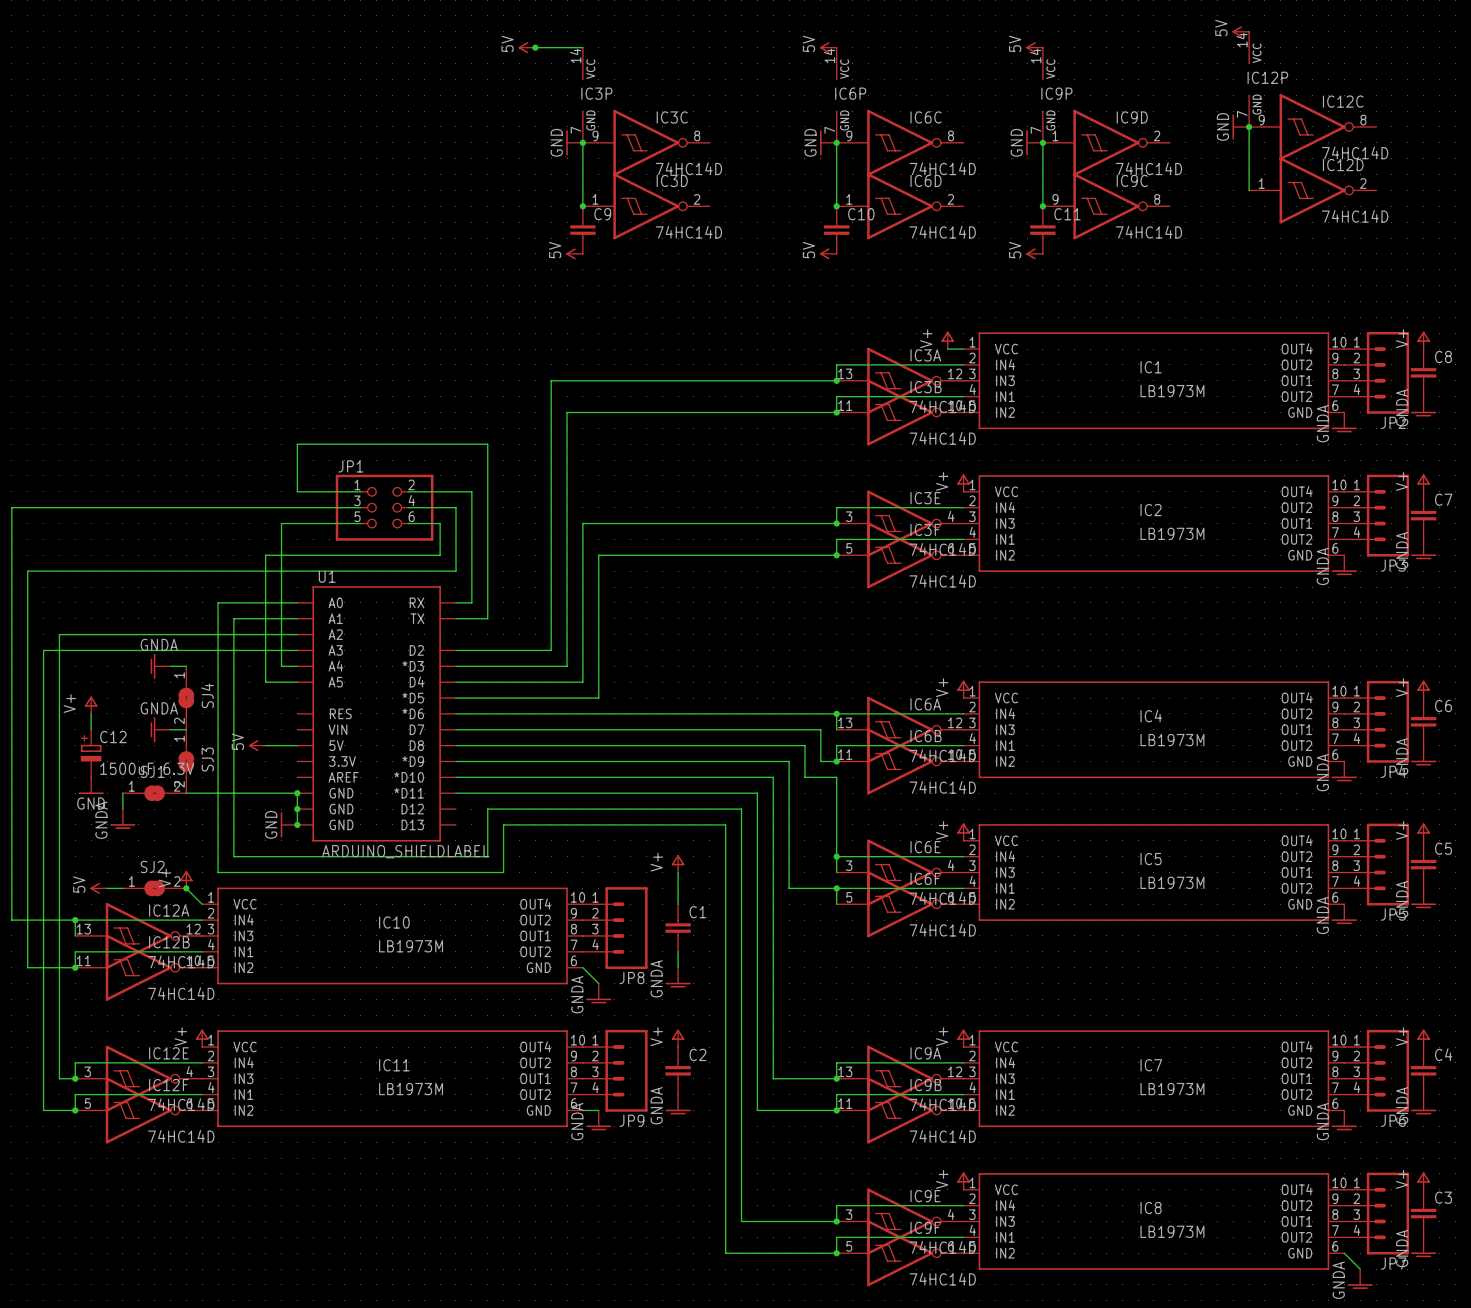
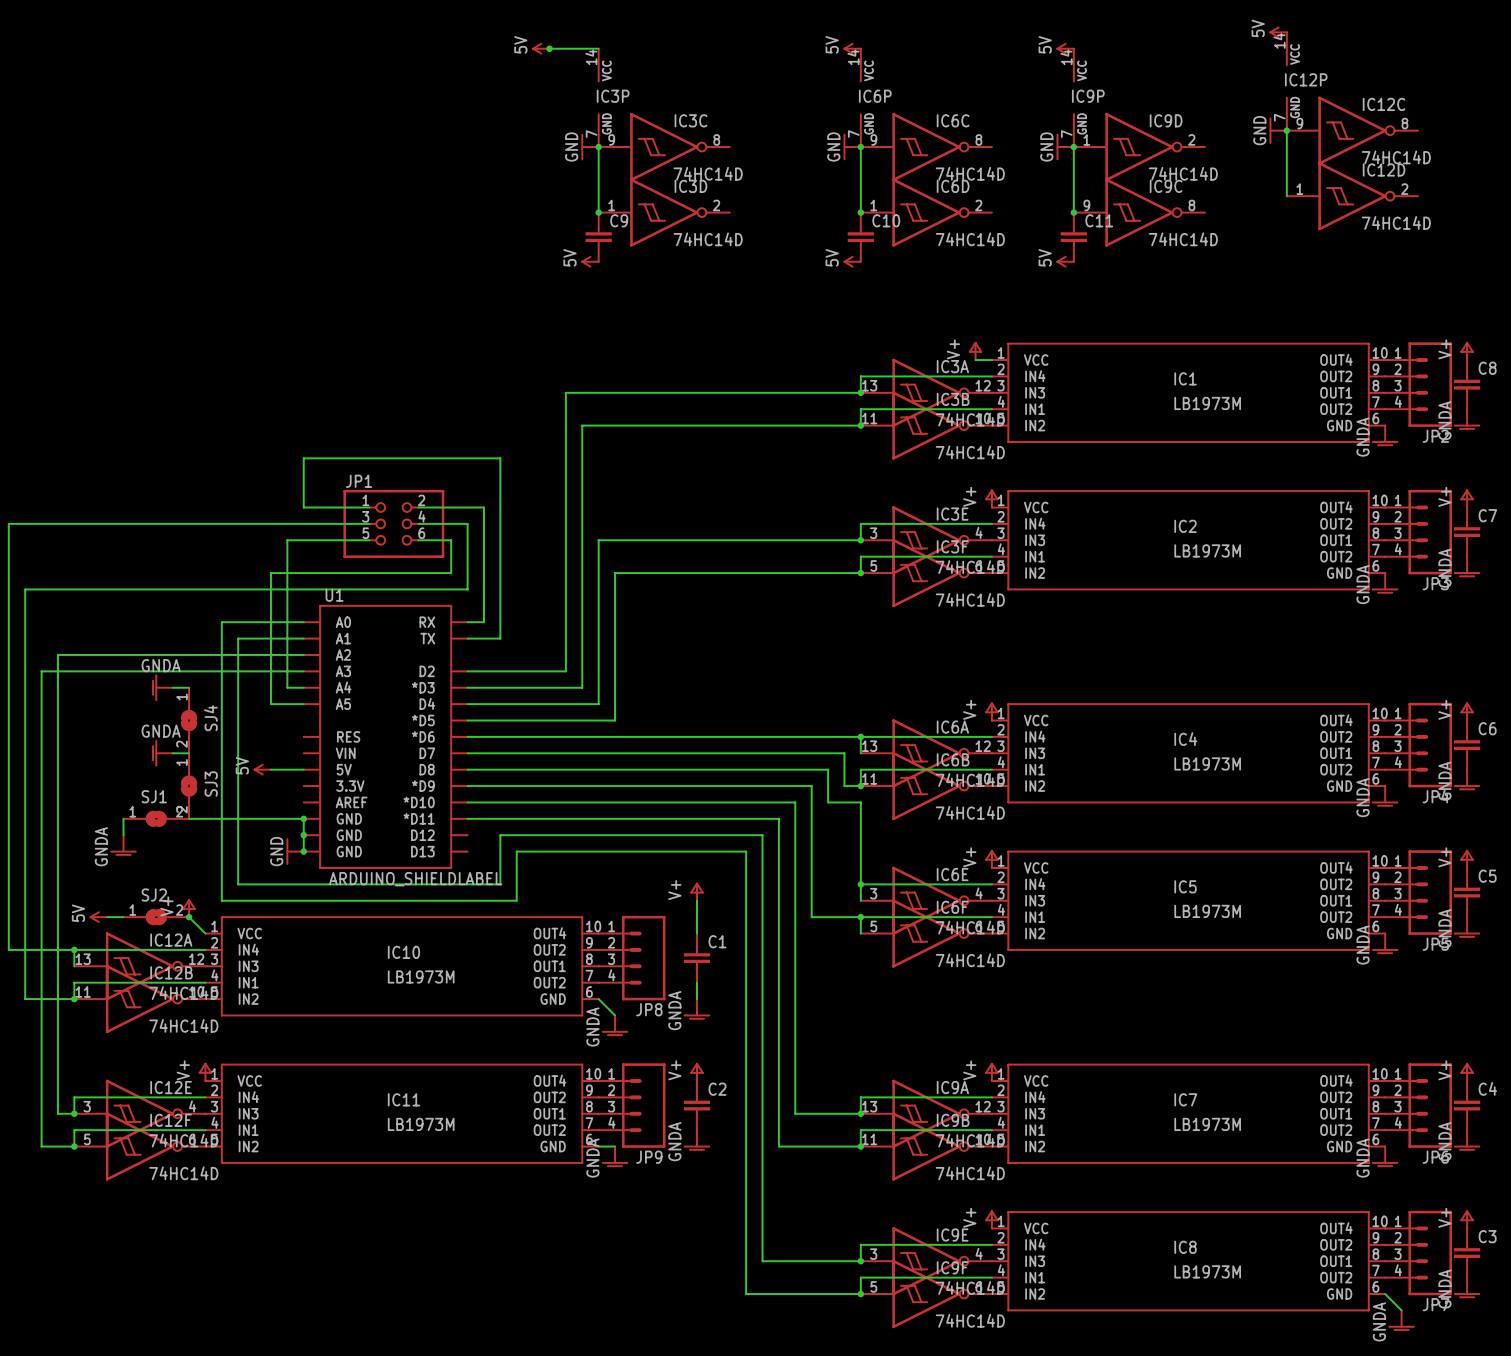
power symbol: V+ (91, 705) -> none
wire: (91, 713) (91, 729) -> none
C12: 1500uF 6.3V (91, 753) -> none
power symbol: GND (91, 785) -> none

